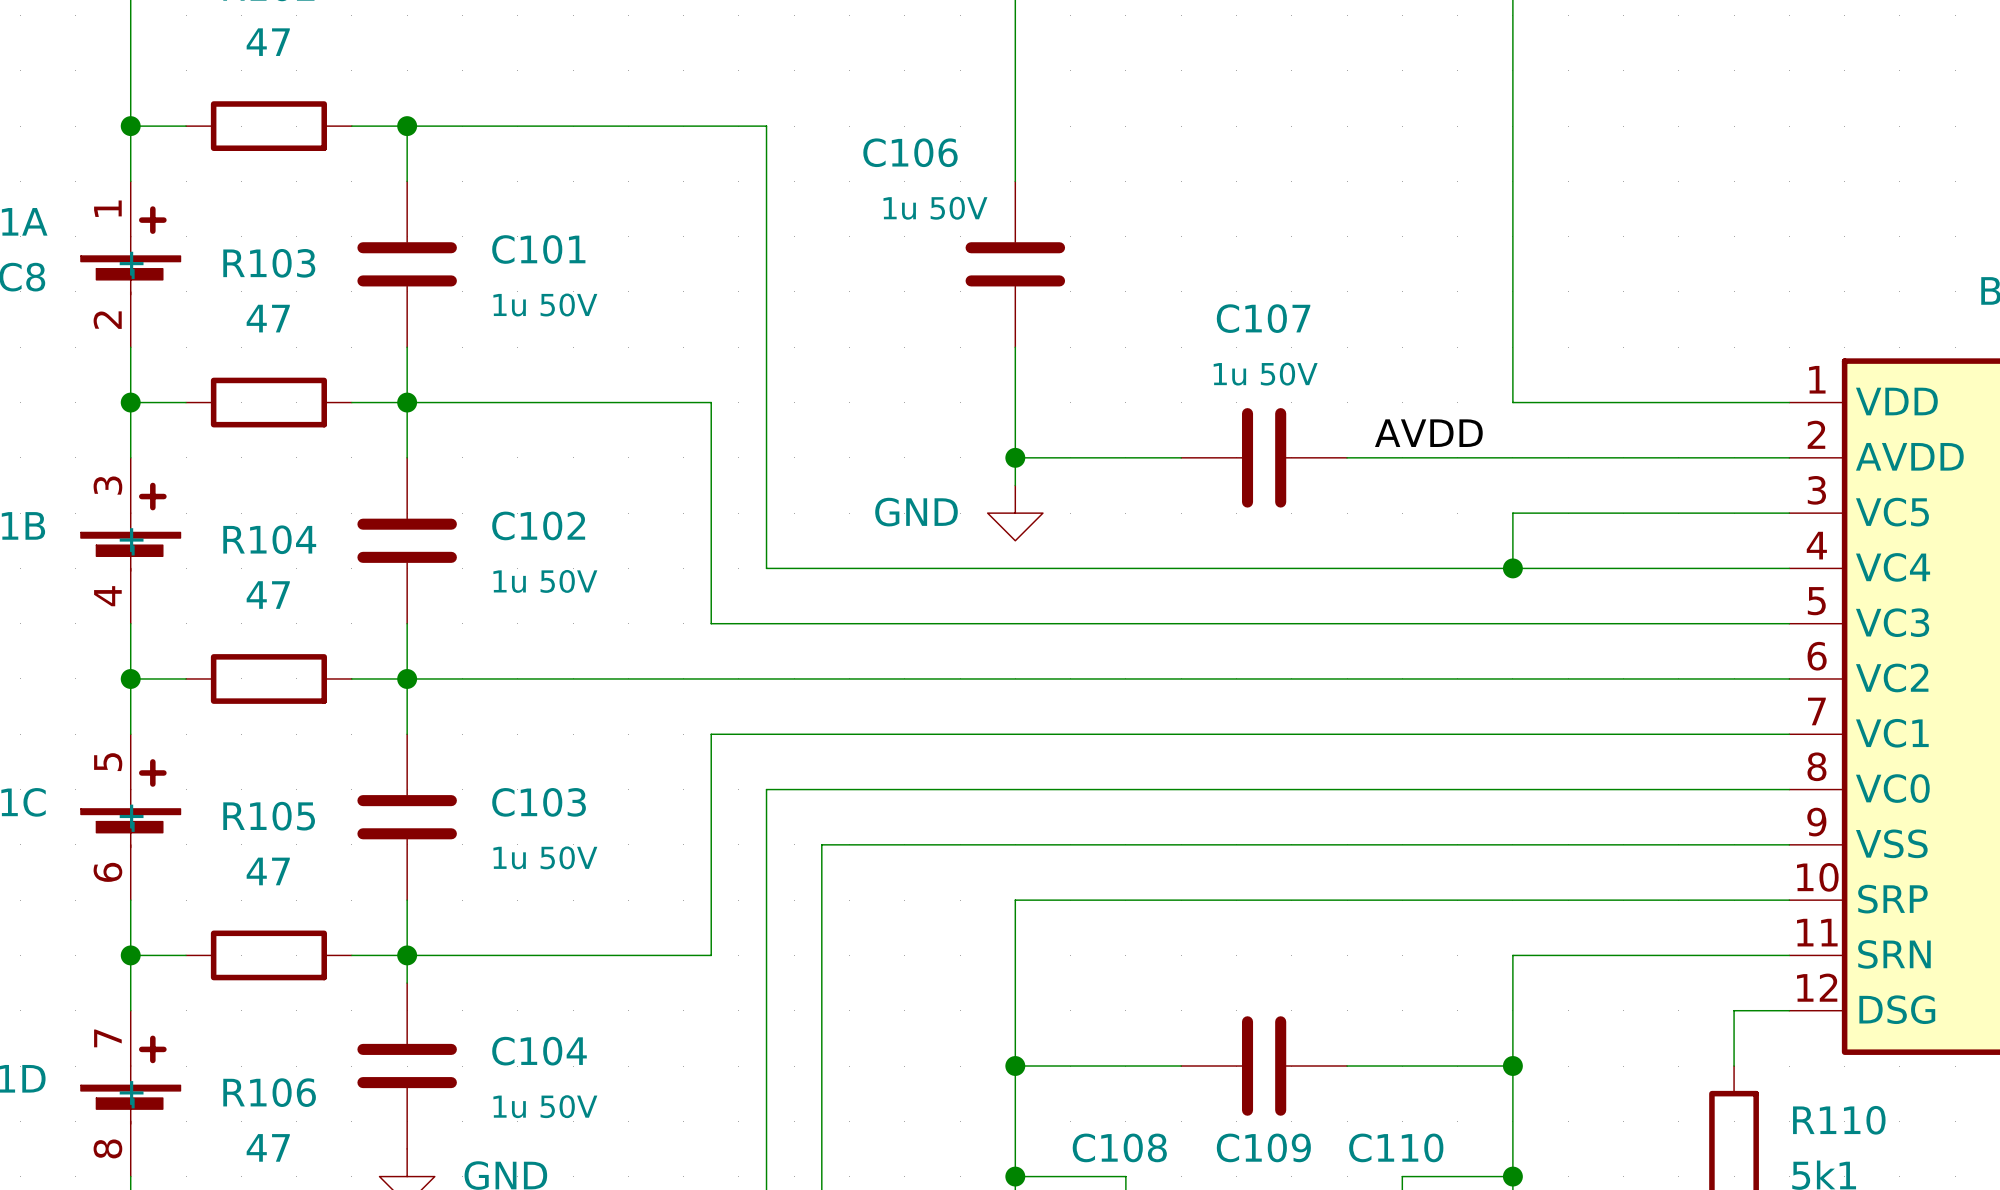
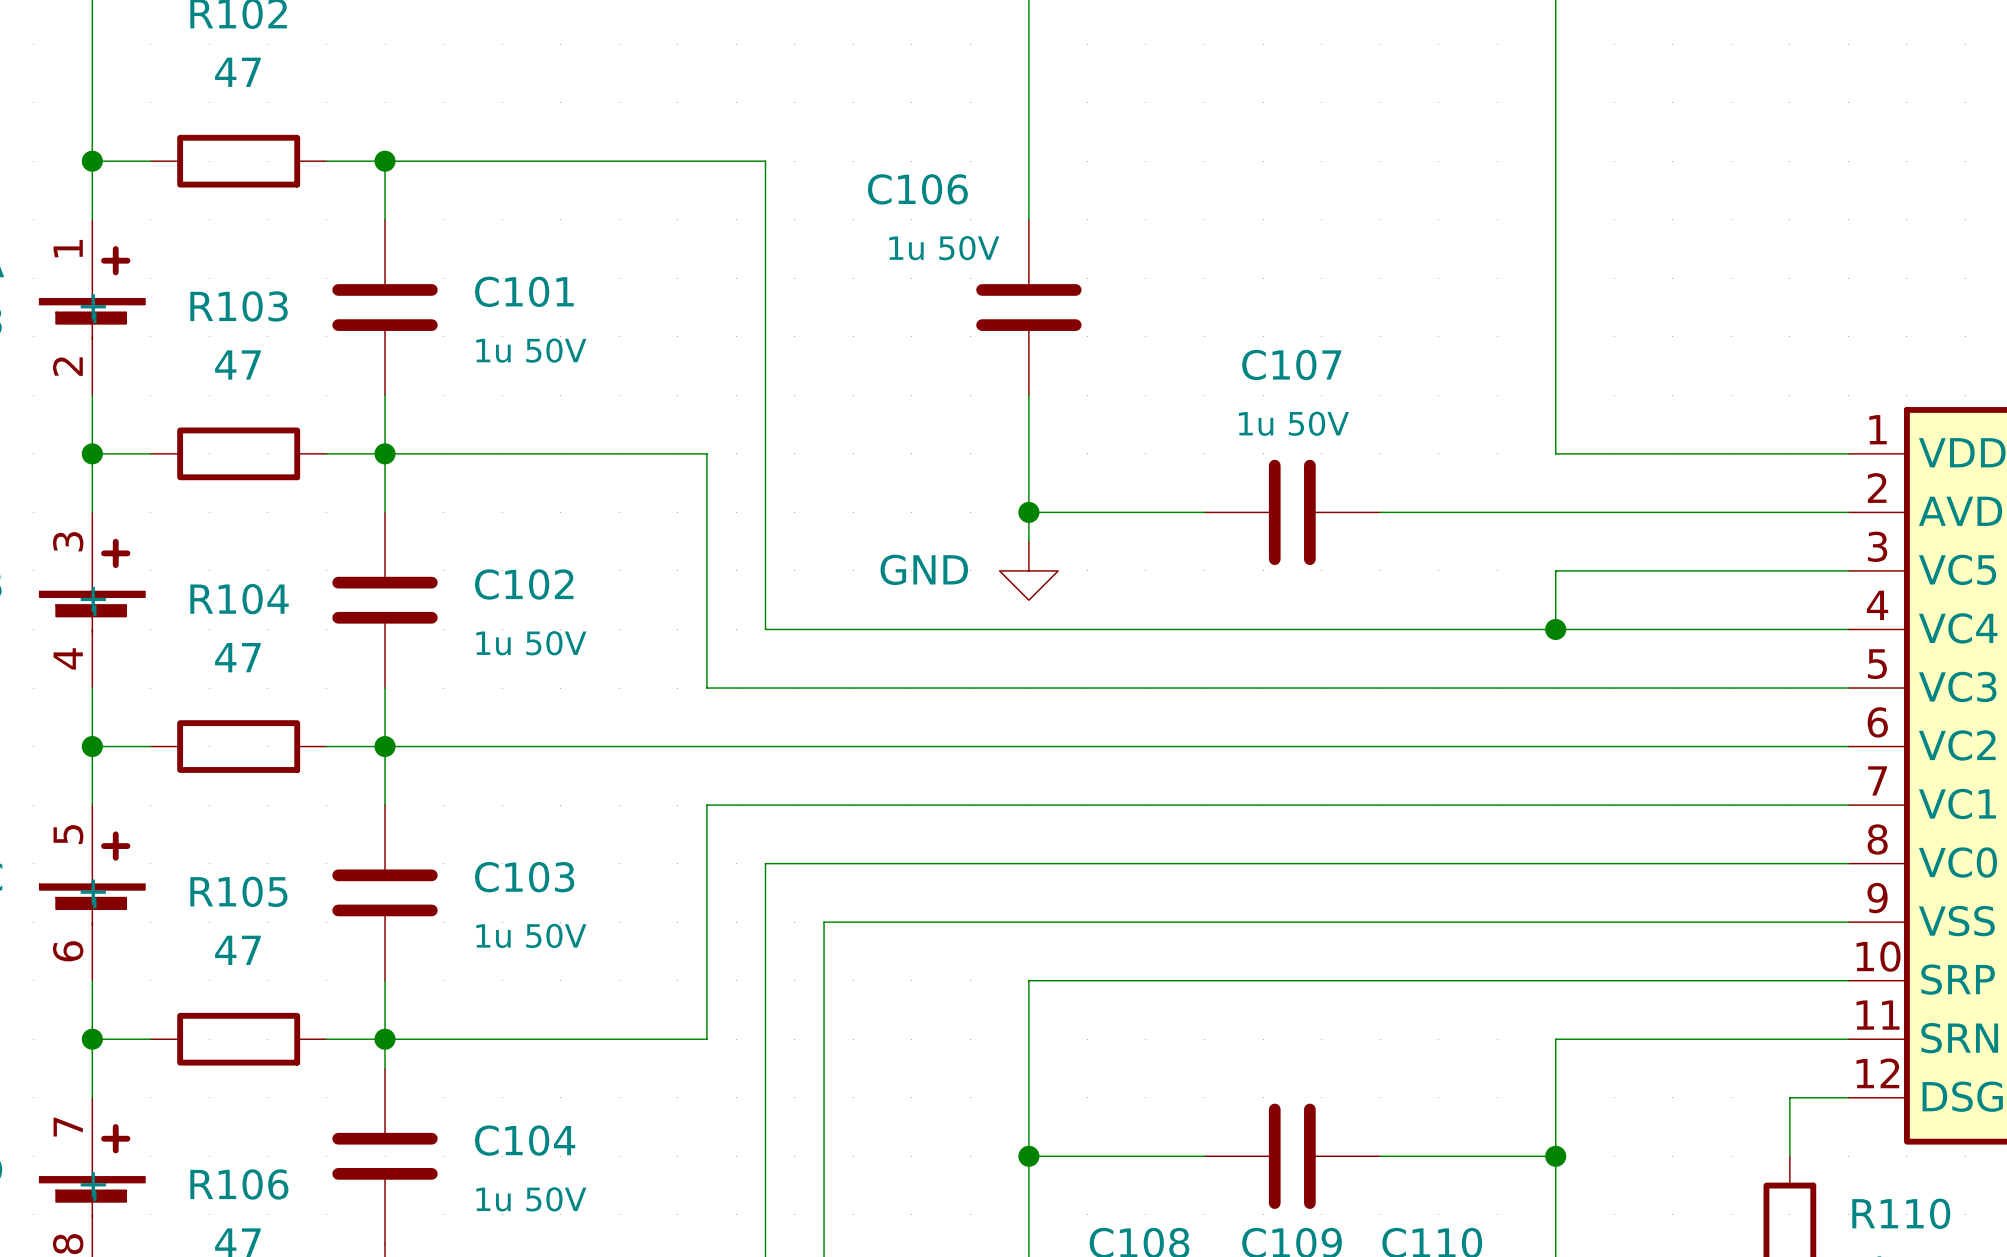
label: AVDD (1428, 433) -> none

